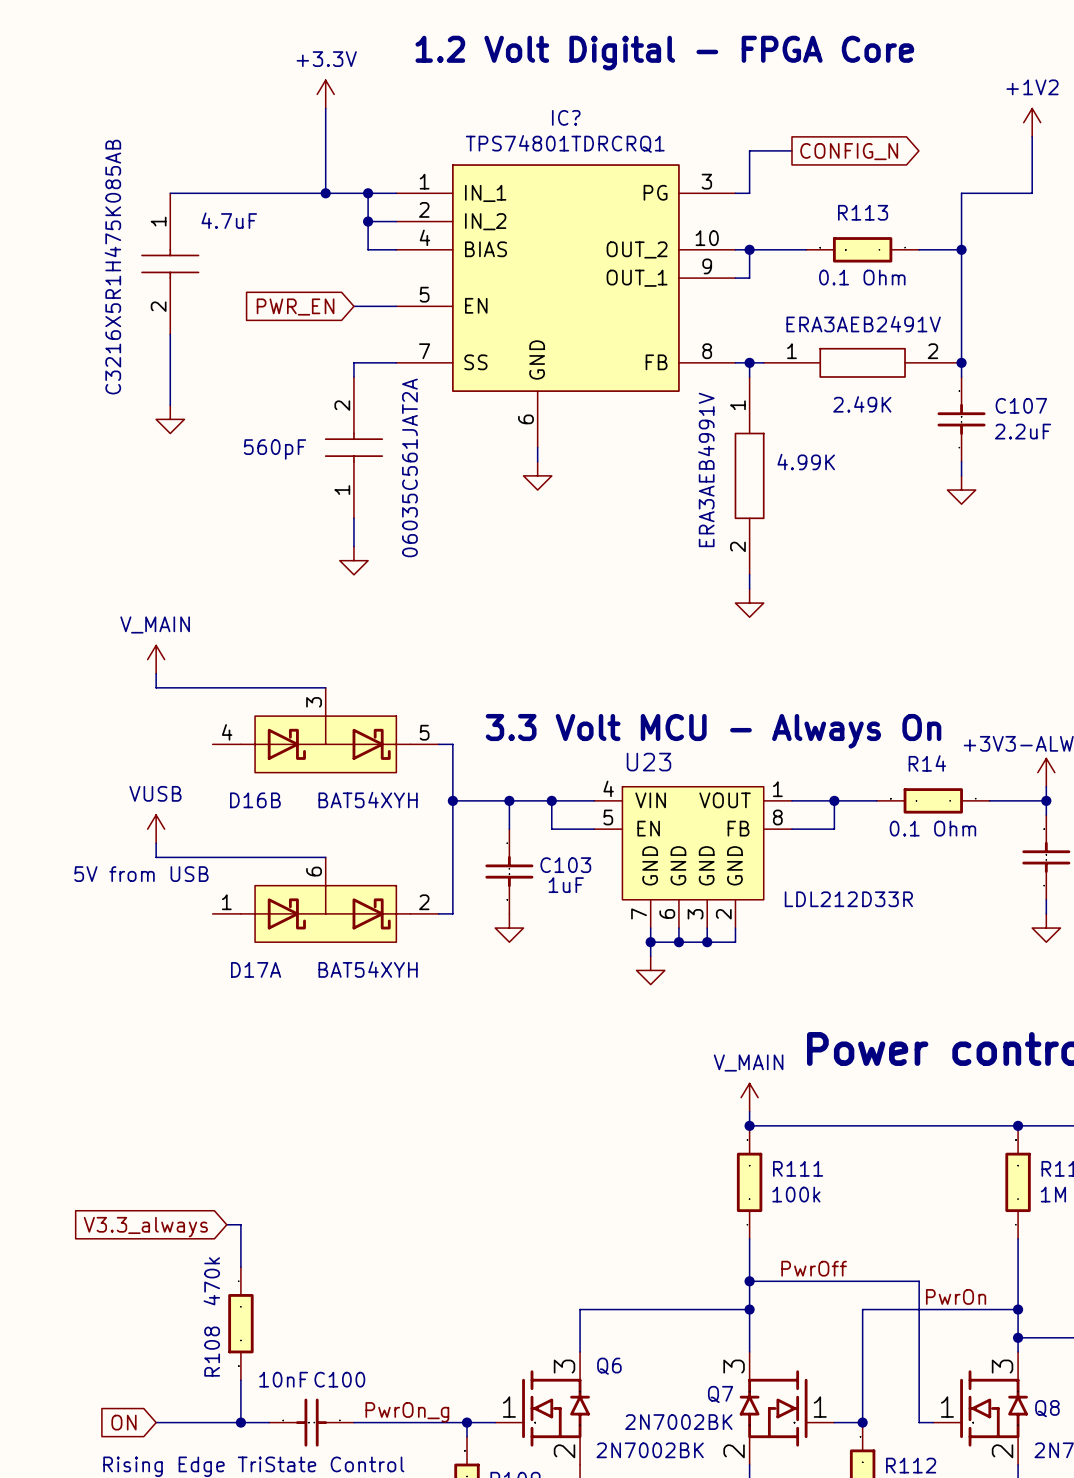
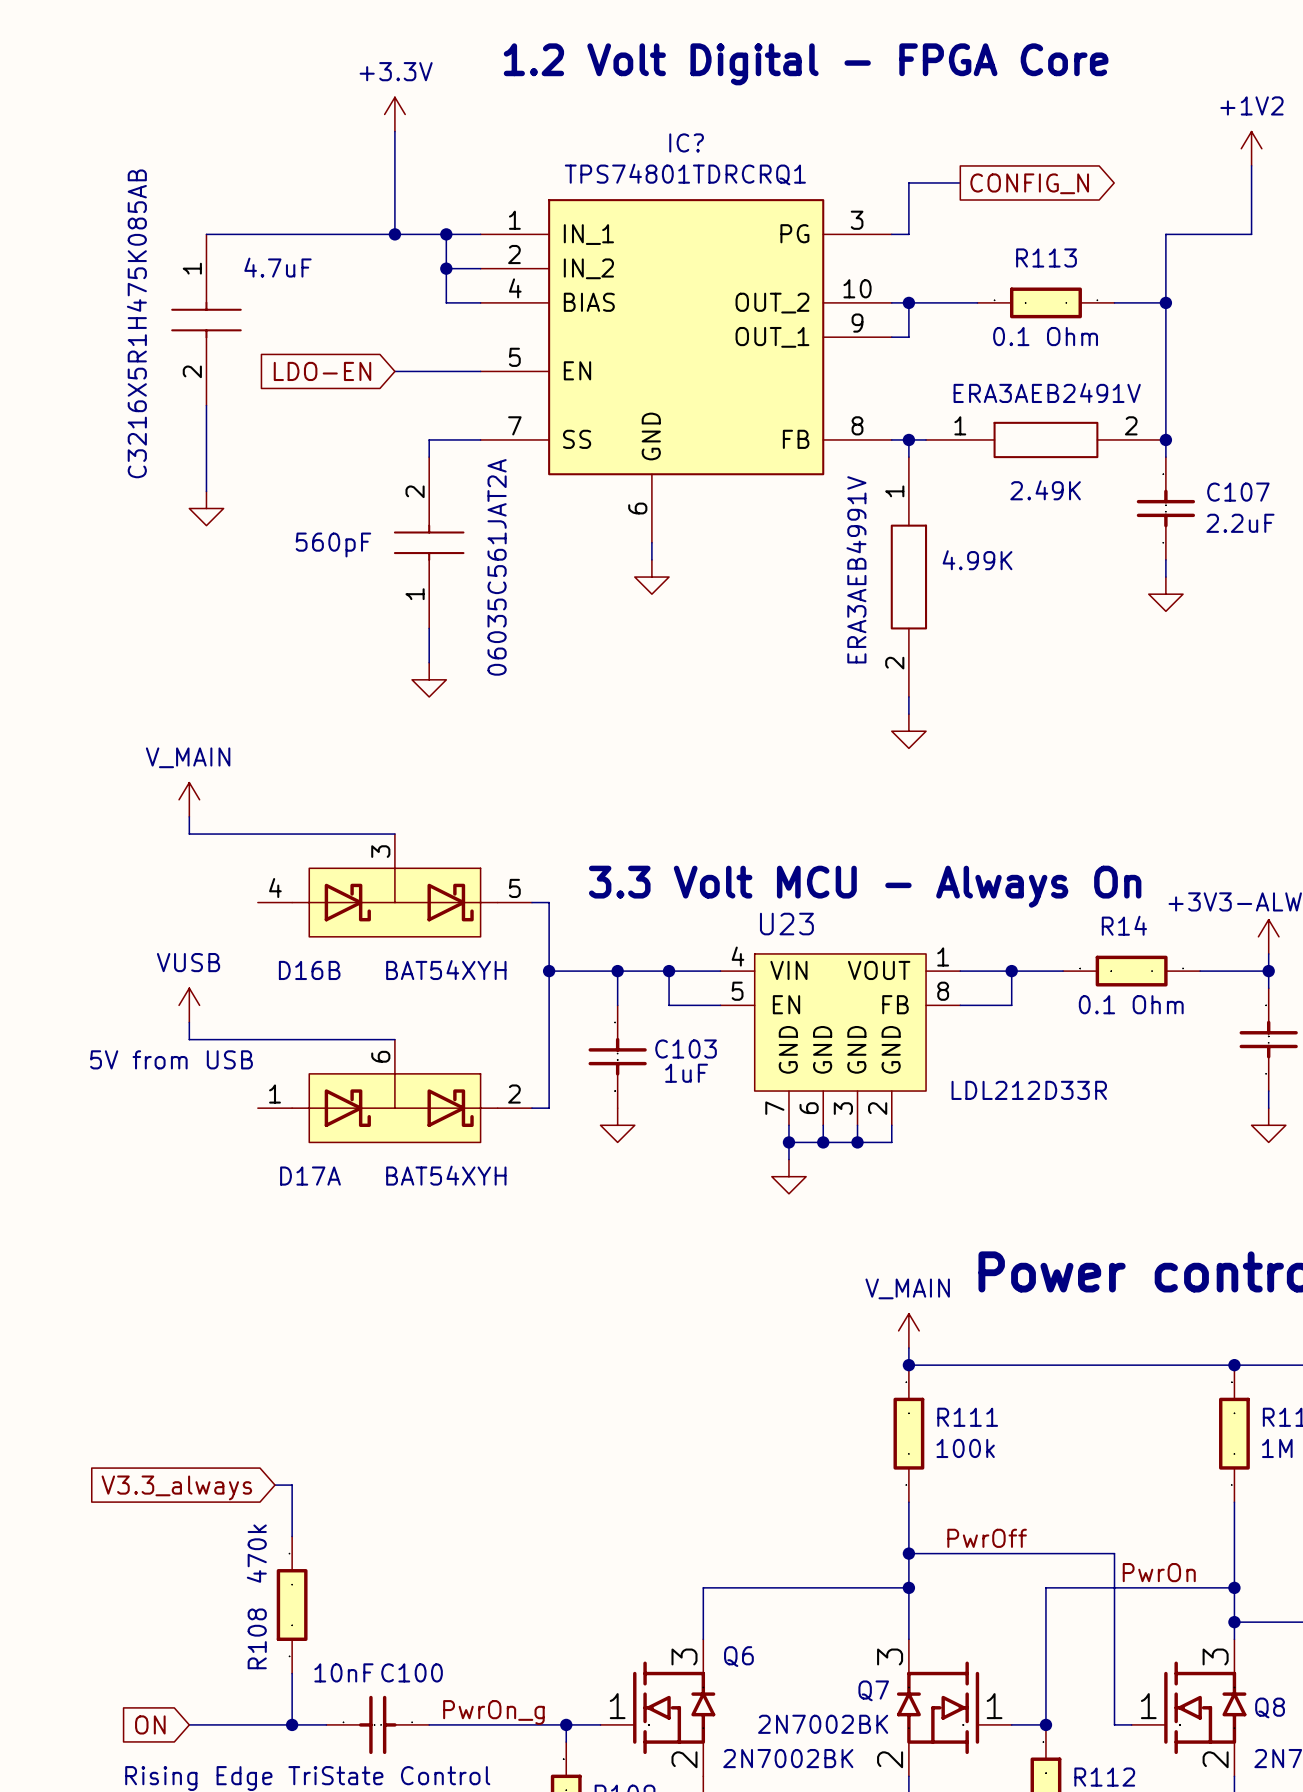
global label: none -> LDO-EN (322, 371)
wire: none -> (394, 371) (429, 371)
global label: PWR_EN (295, 307) -> none

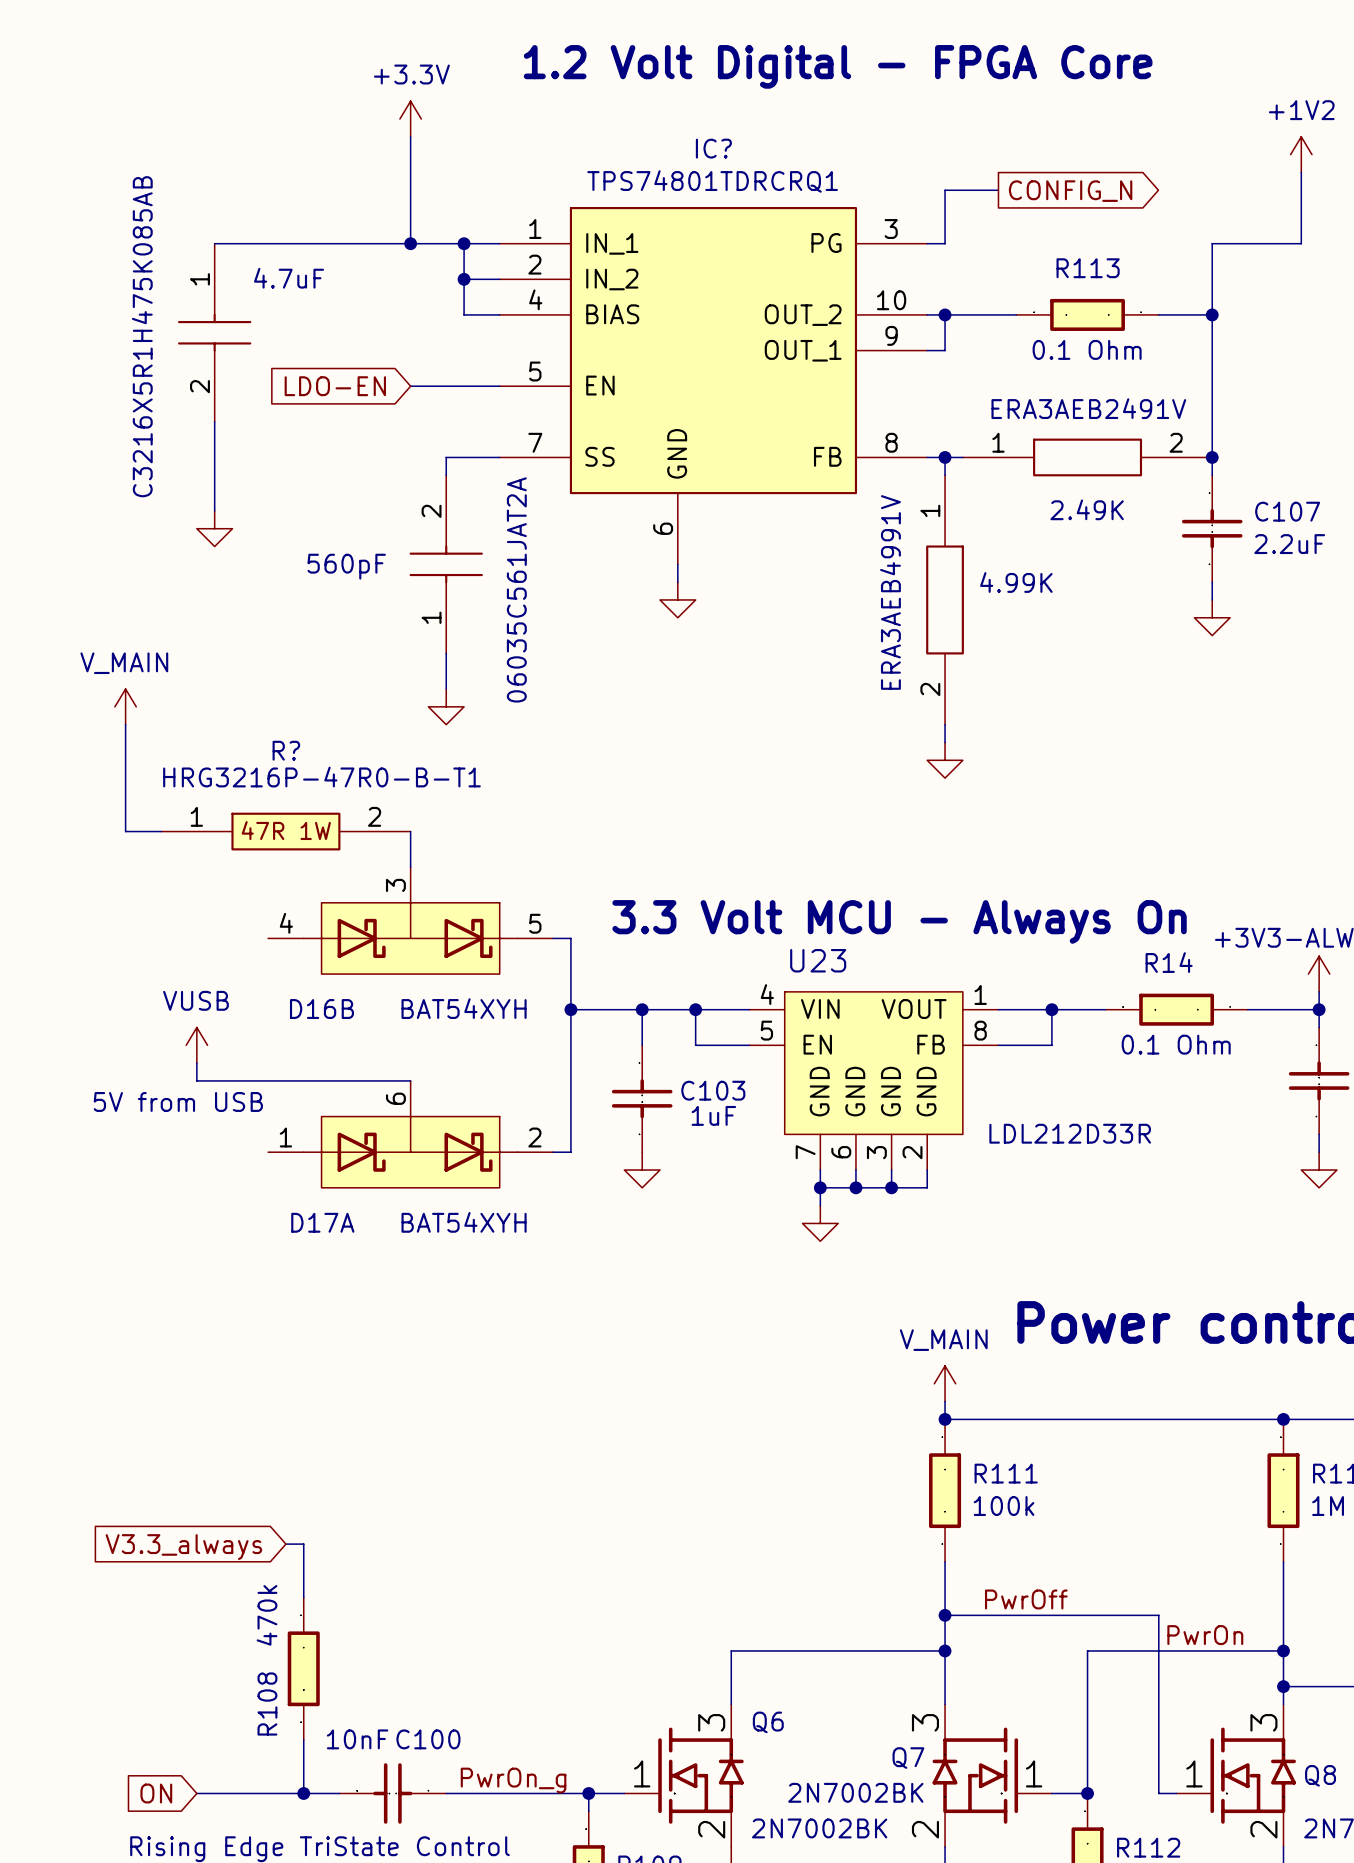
wire: none -> (125, 724) (125, 831) (161, 831)
power symbol position: V_MAIN (189, 799) -> V_MAIN (125, 706)
R?: none -> HRG3216P-47R0-B-T1 (285, 831)
wire: (189, 816) (189, 834) (394, 834) -> (410, 831) (410, 867)

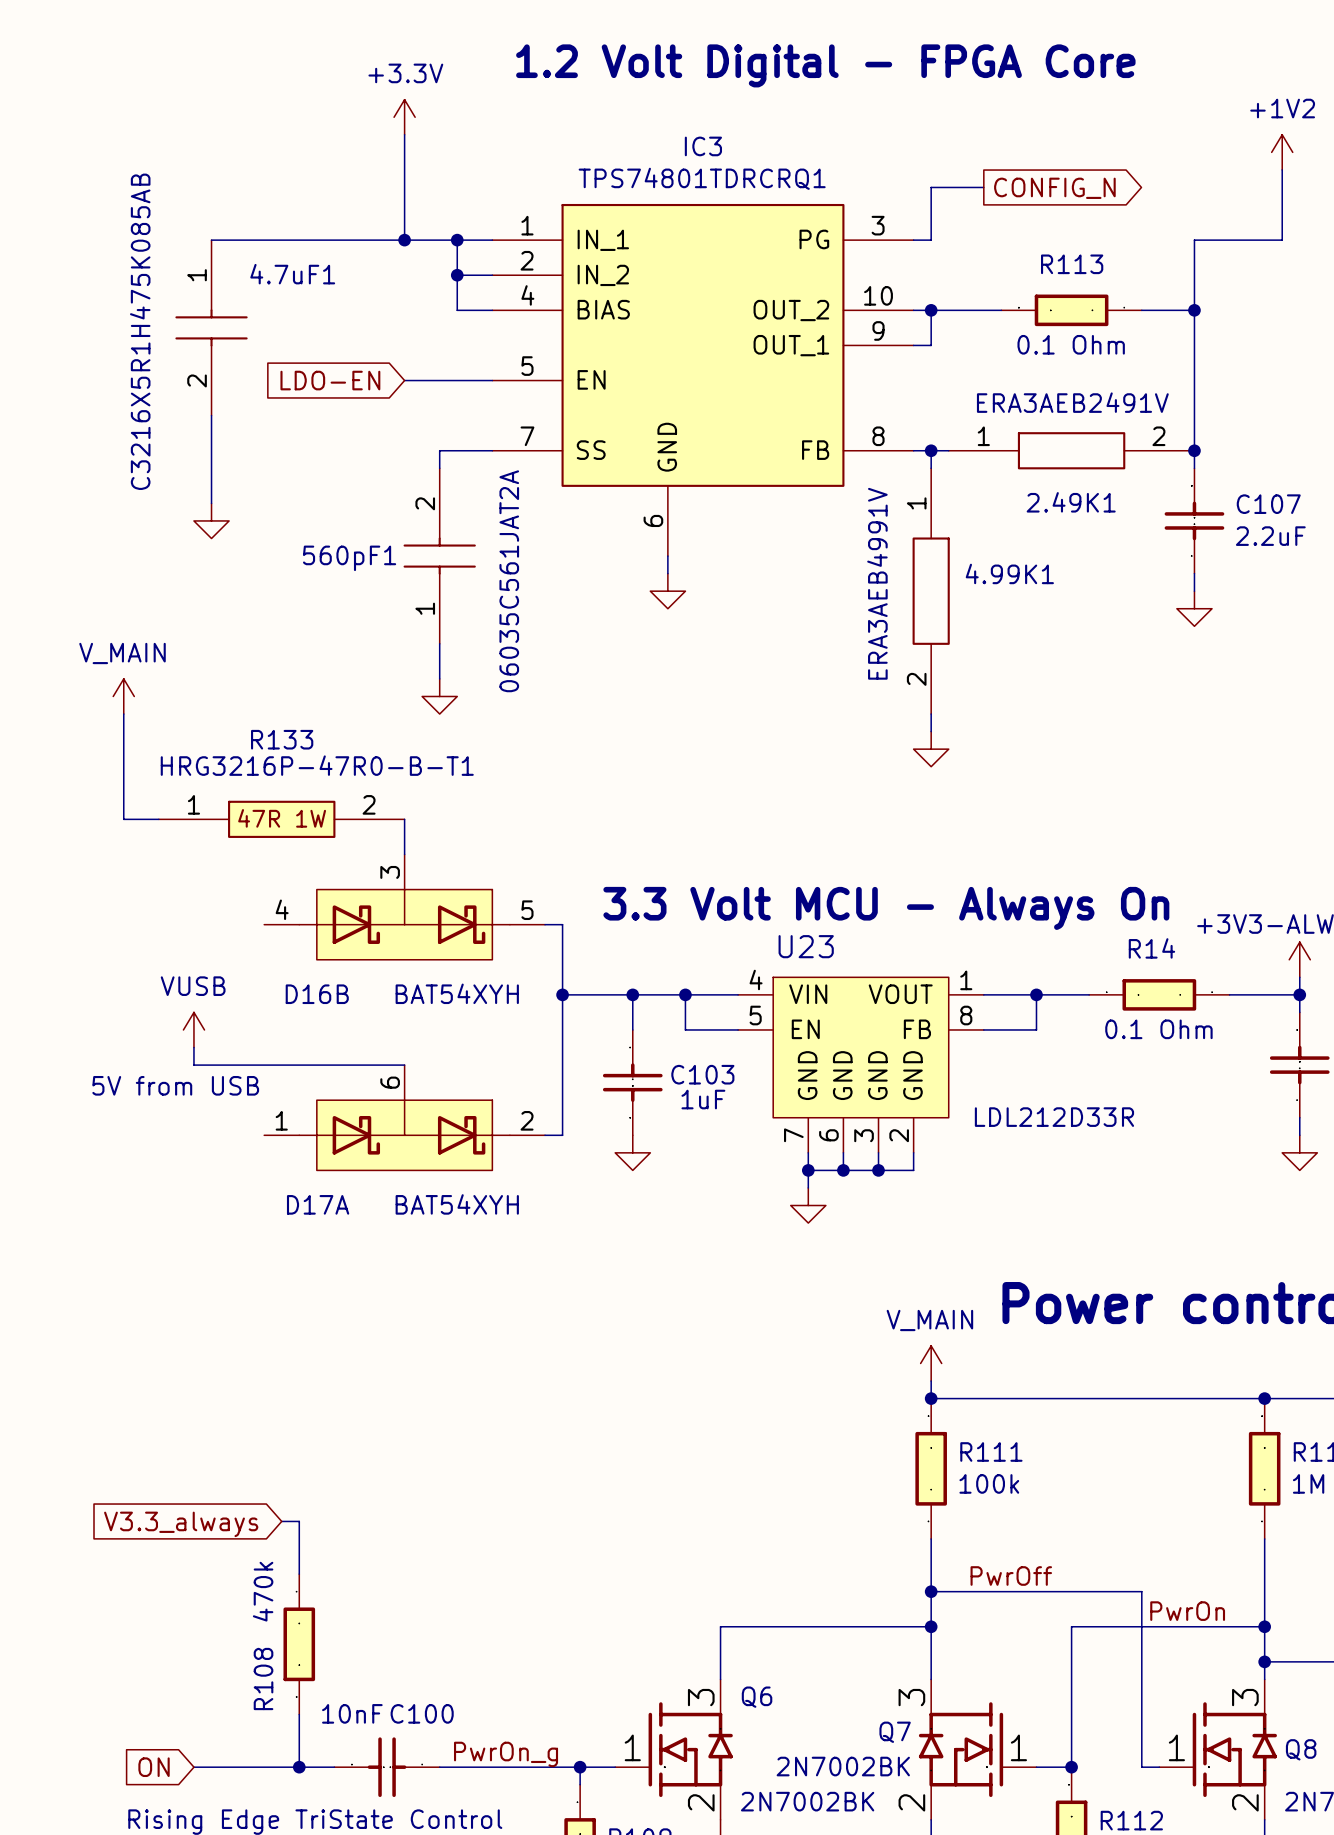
IC? name: IC? (713, 148) -> IC3 (703, 146)
4.7uF name: 4.7uF (289, 278) -> 4.7uF1 (292, 274)
2.49K name: 2.49K (1087, 509) -> 2.49K1 (1071, 502)
560pF name: 560pF (346, 566) -> 560pF1 (349, 558)
4.99K name: 4.99K (1016, 582) -> 4.99K1 (1009, 573)
R? name: R? (286, 750) -> R133 (282, 739)

